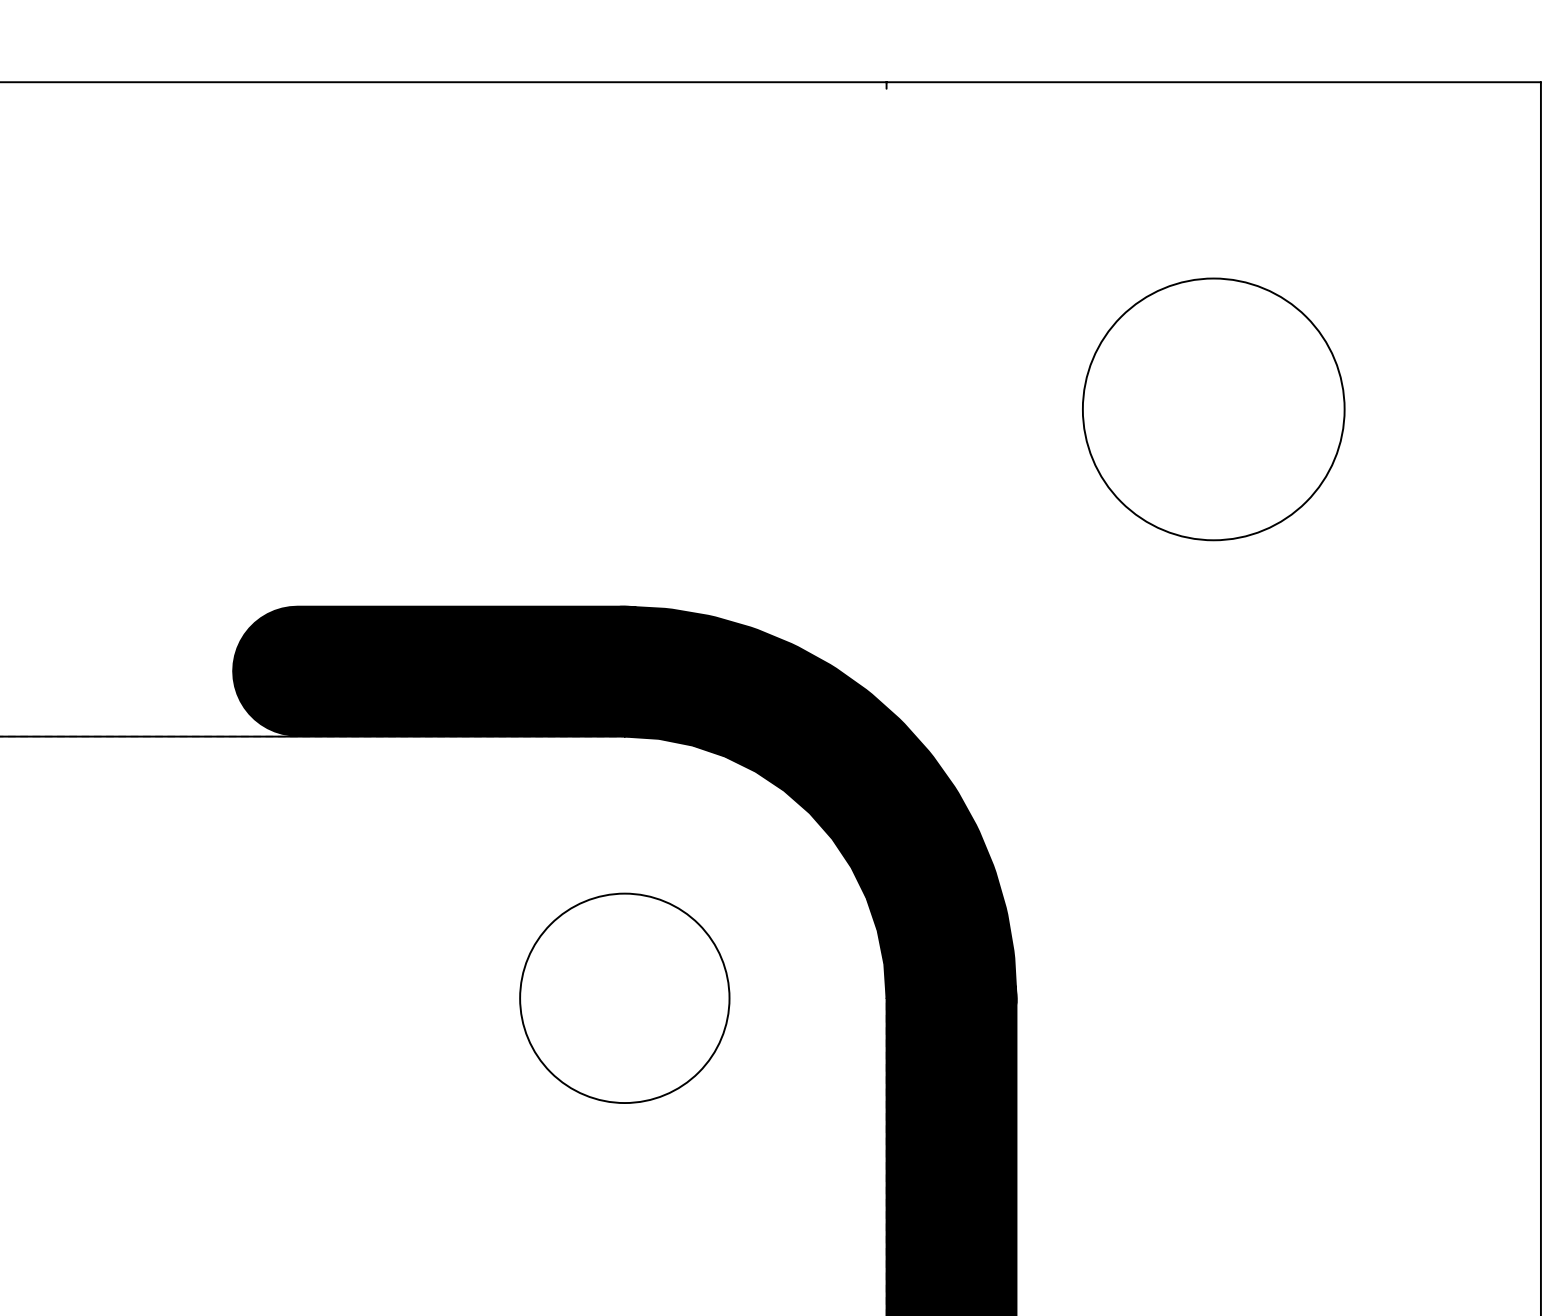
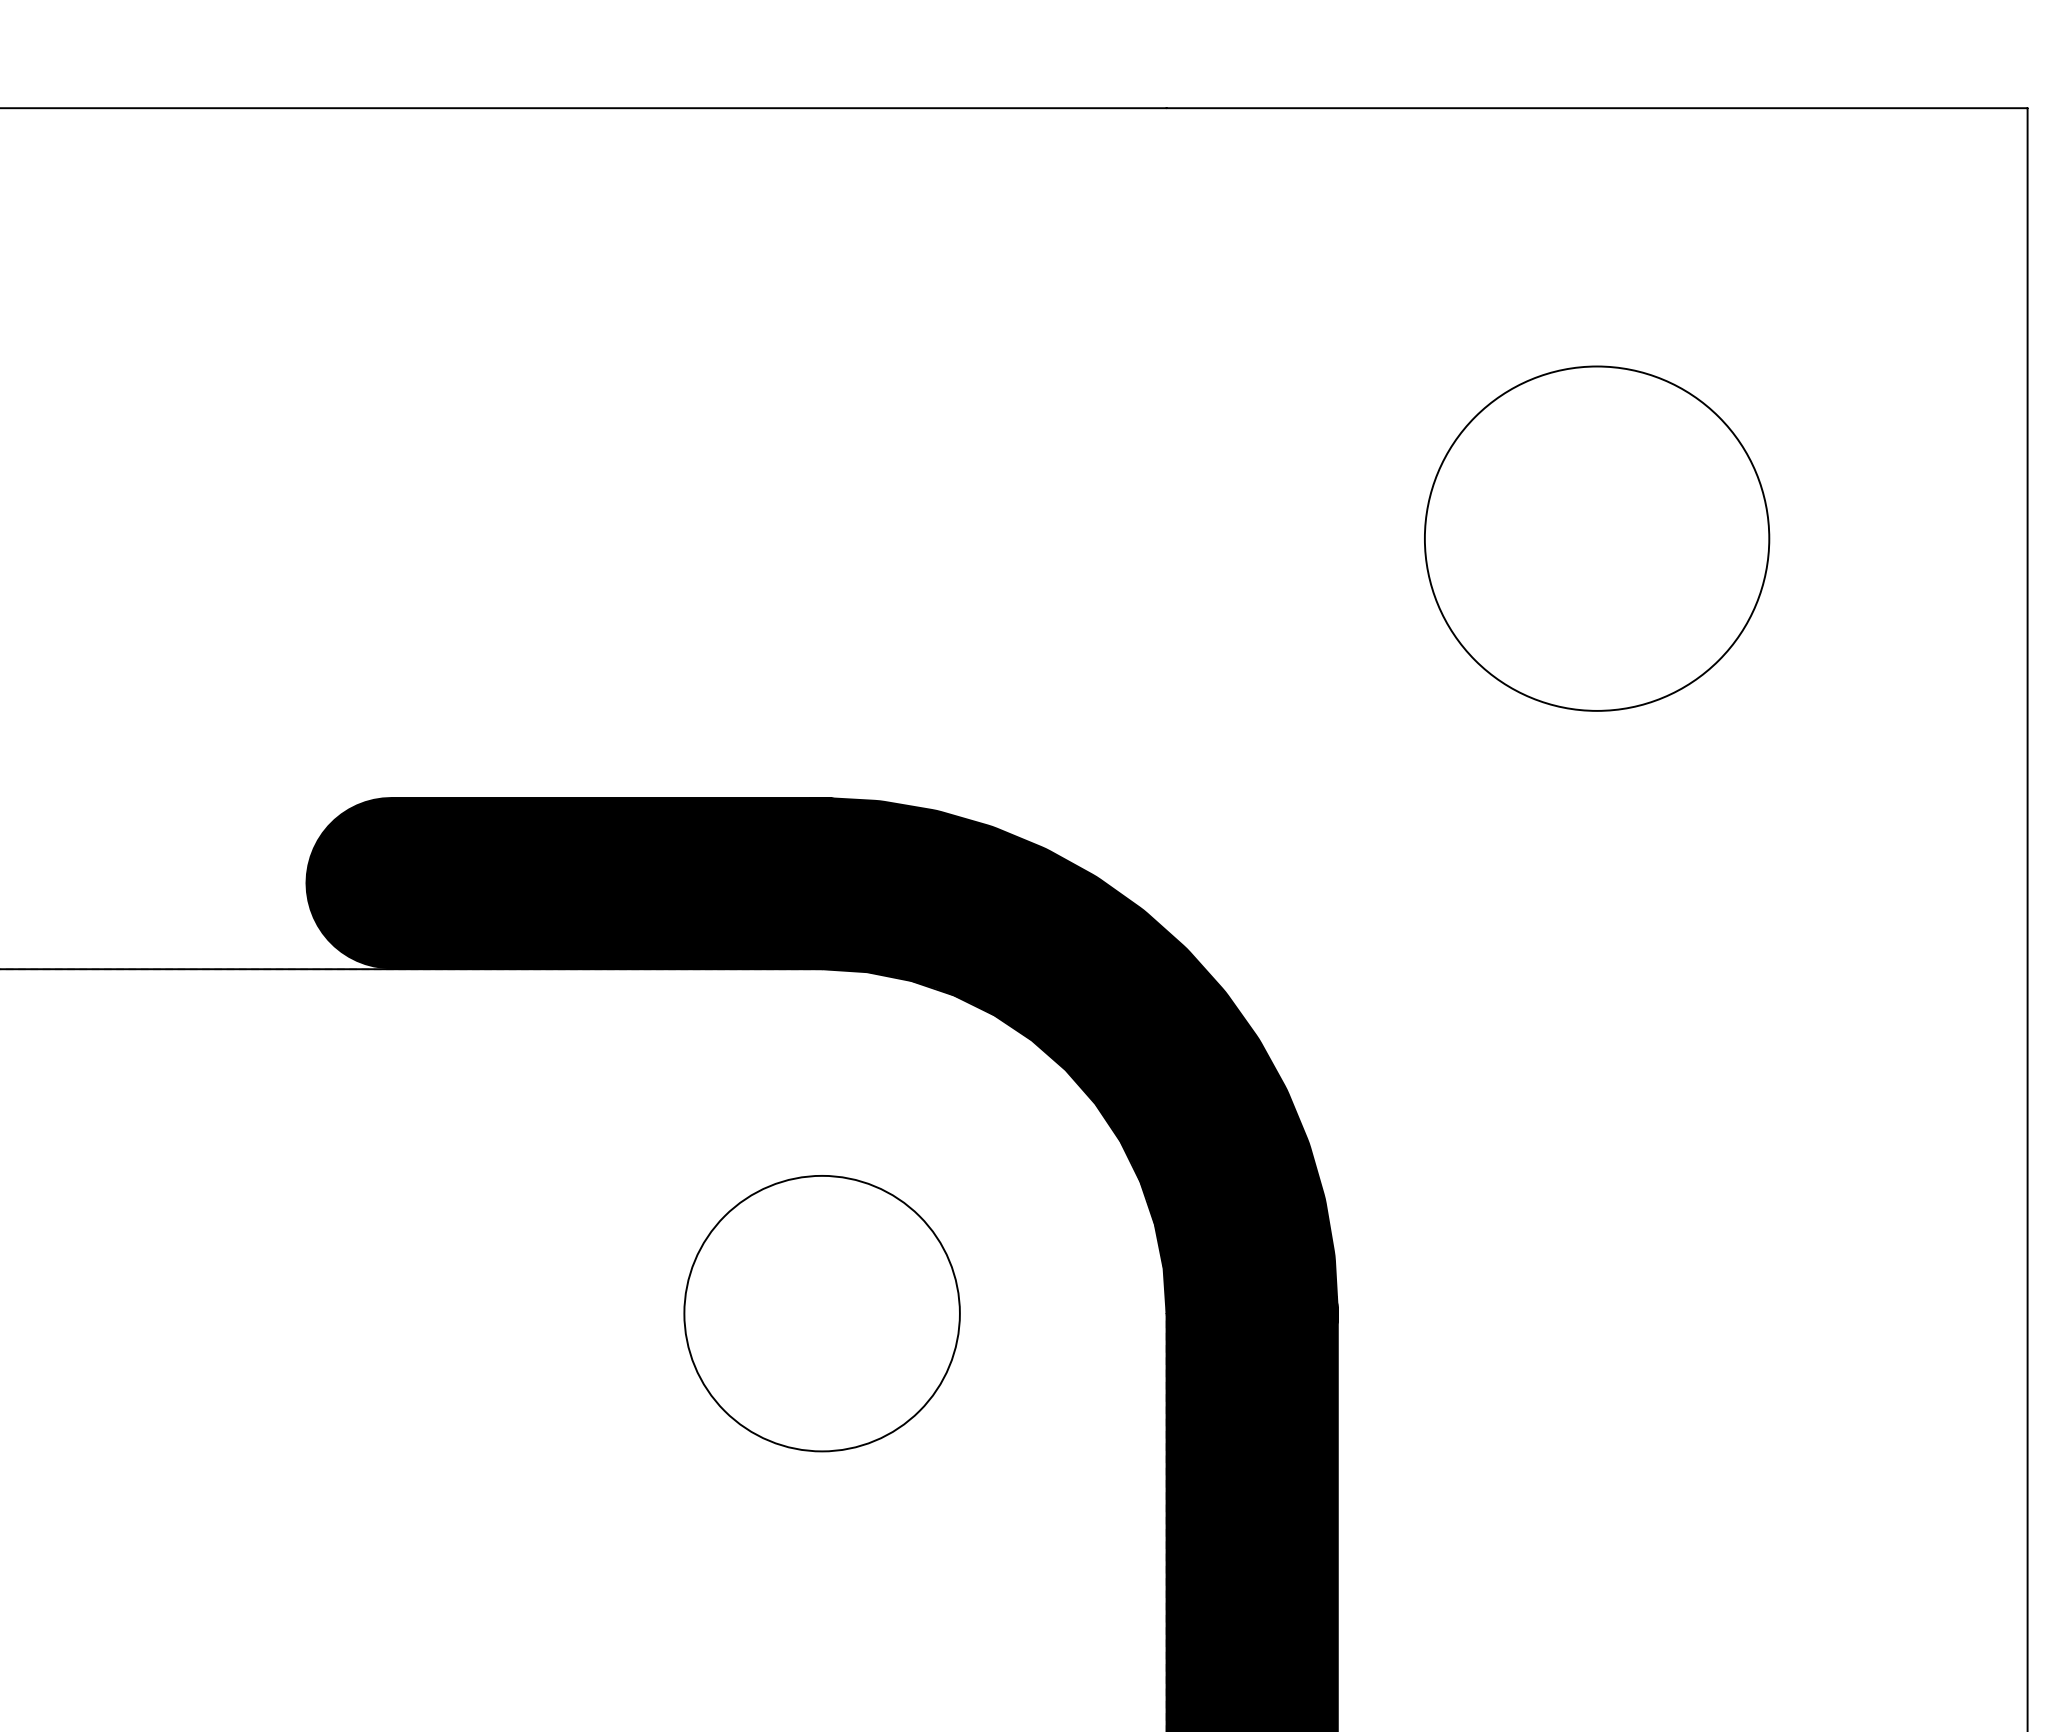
board edge: (886, 82) (886, 88) -> none

